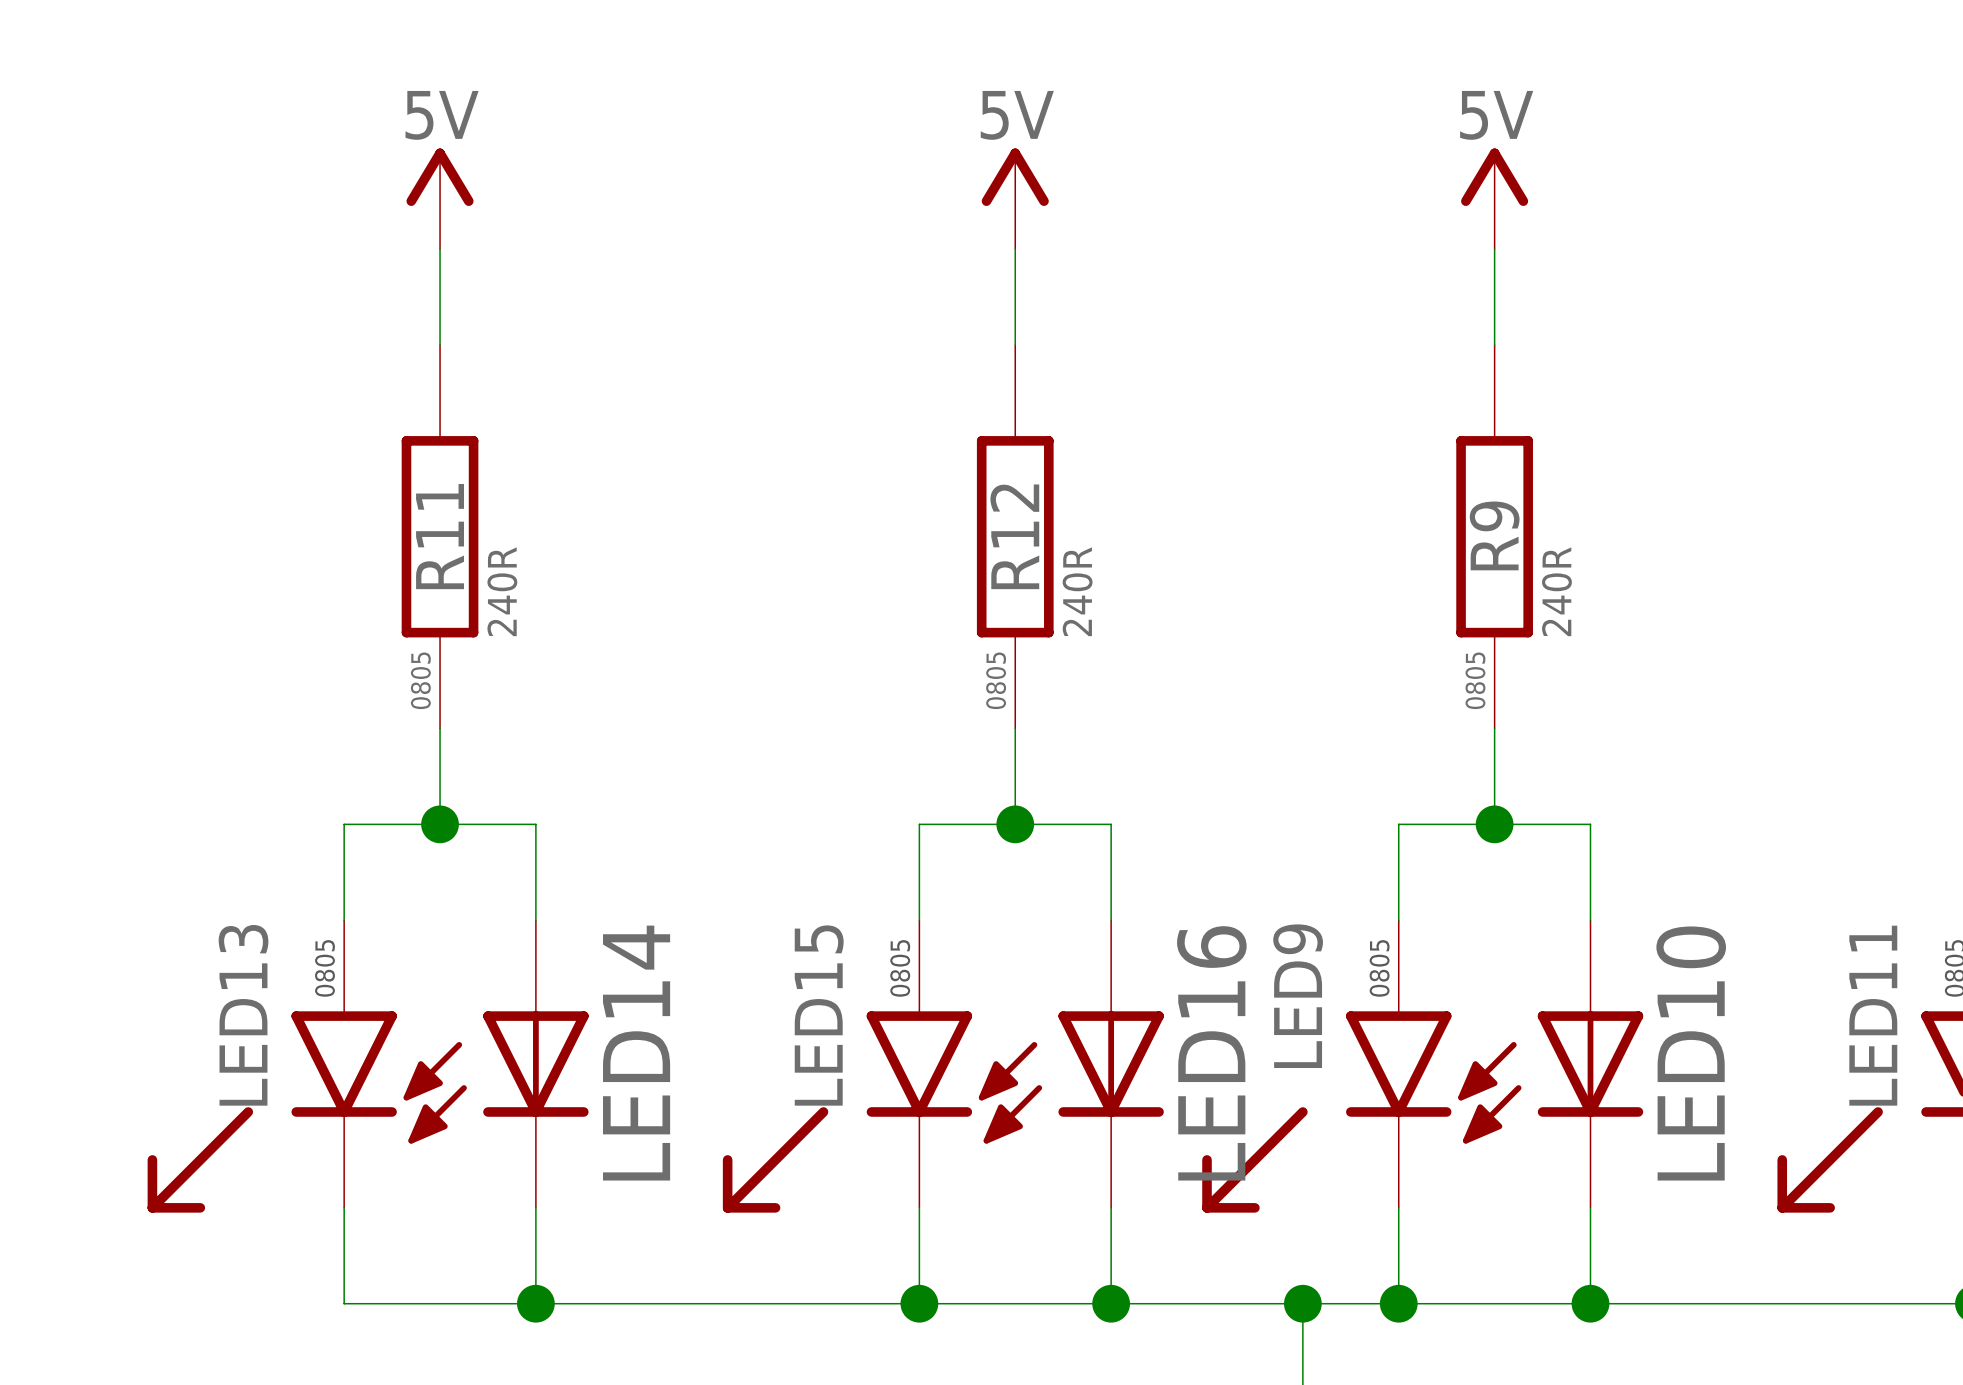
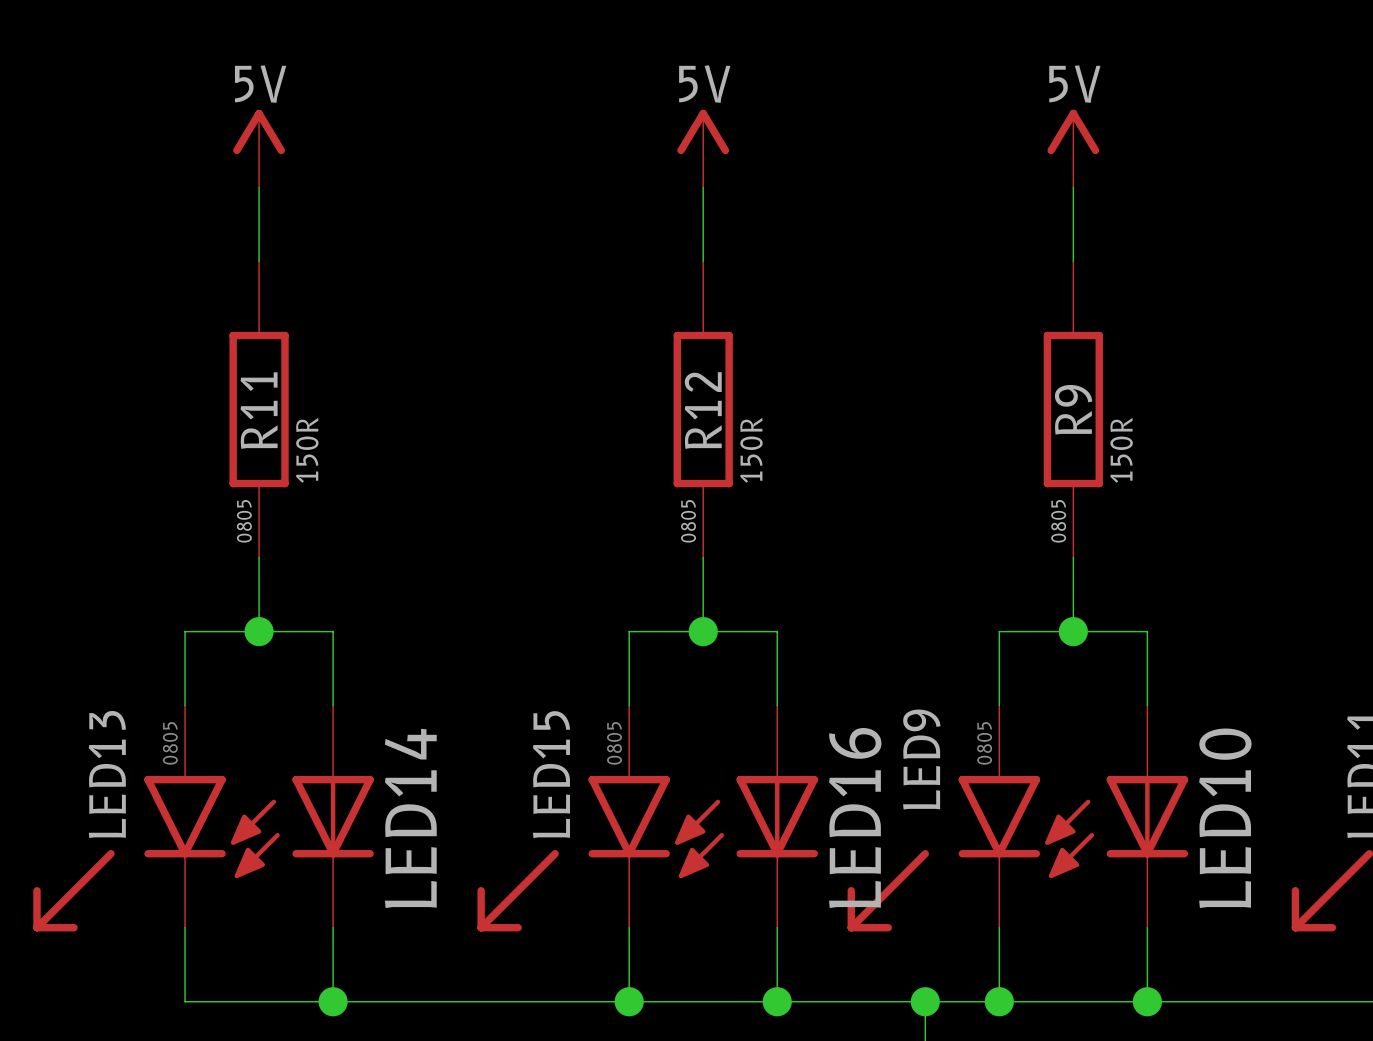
R11 value: 240R (502, 591) -> 150R (307, 450)
R12 value: 240R (1077, 591) -> 150R (751, 450)
R9 value: 240R (1556, 591) -> 150R (1121, 450)

